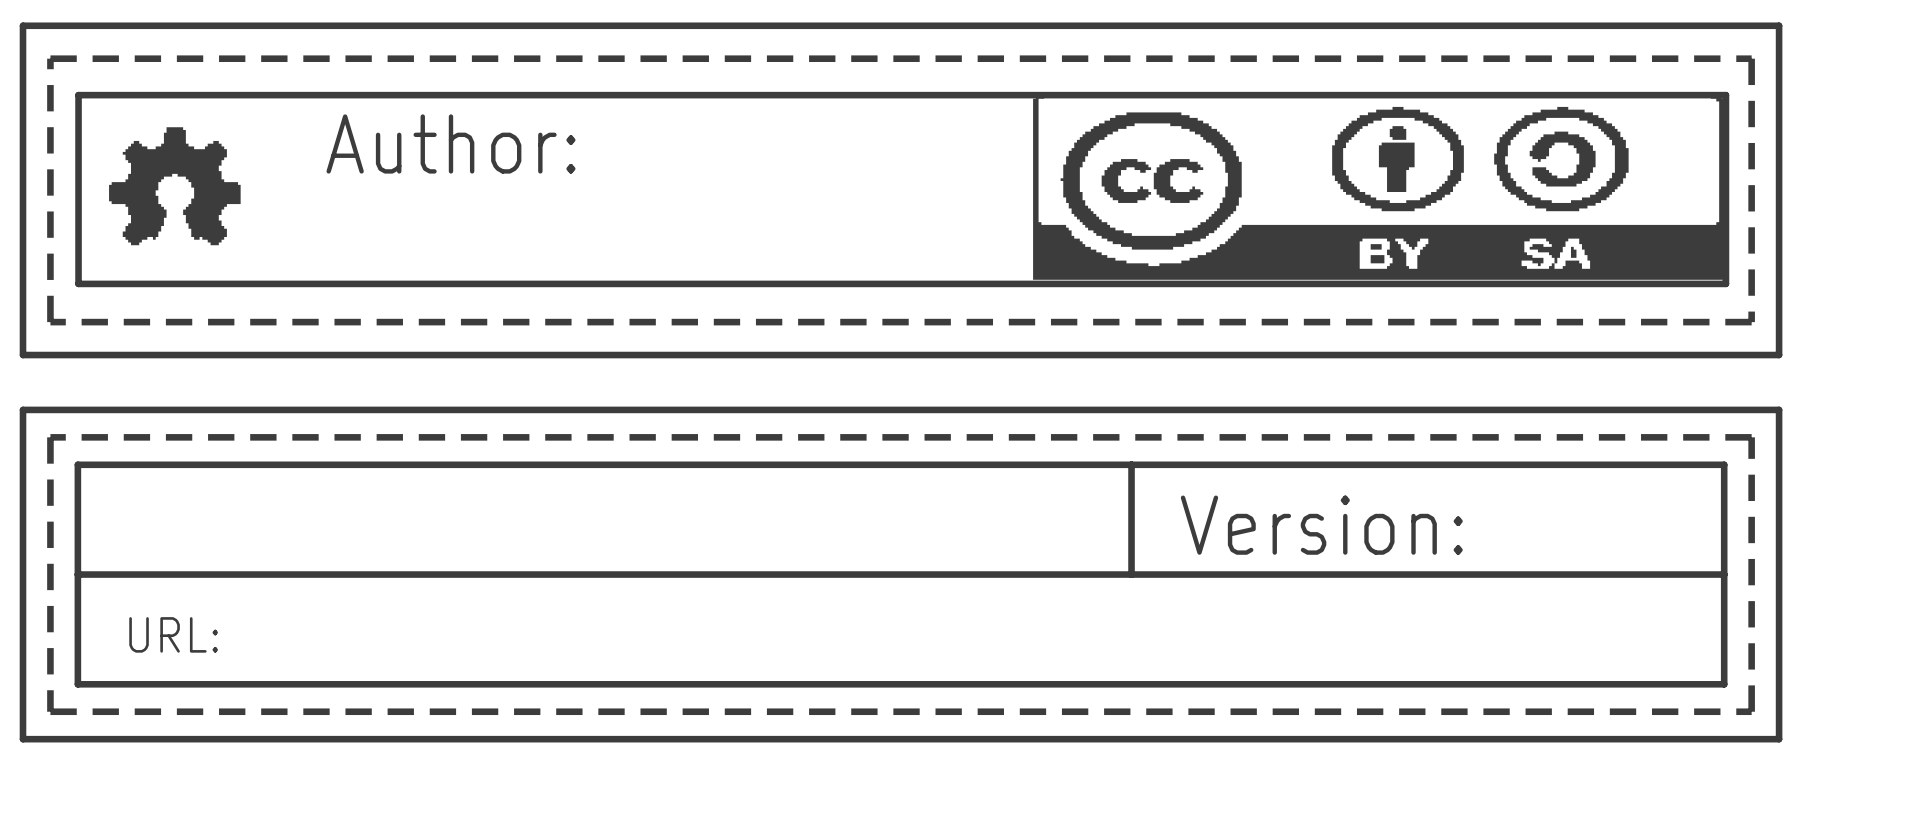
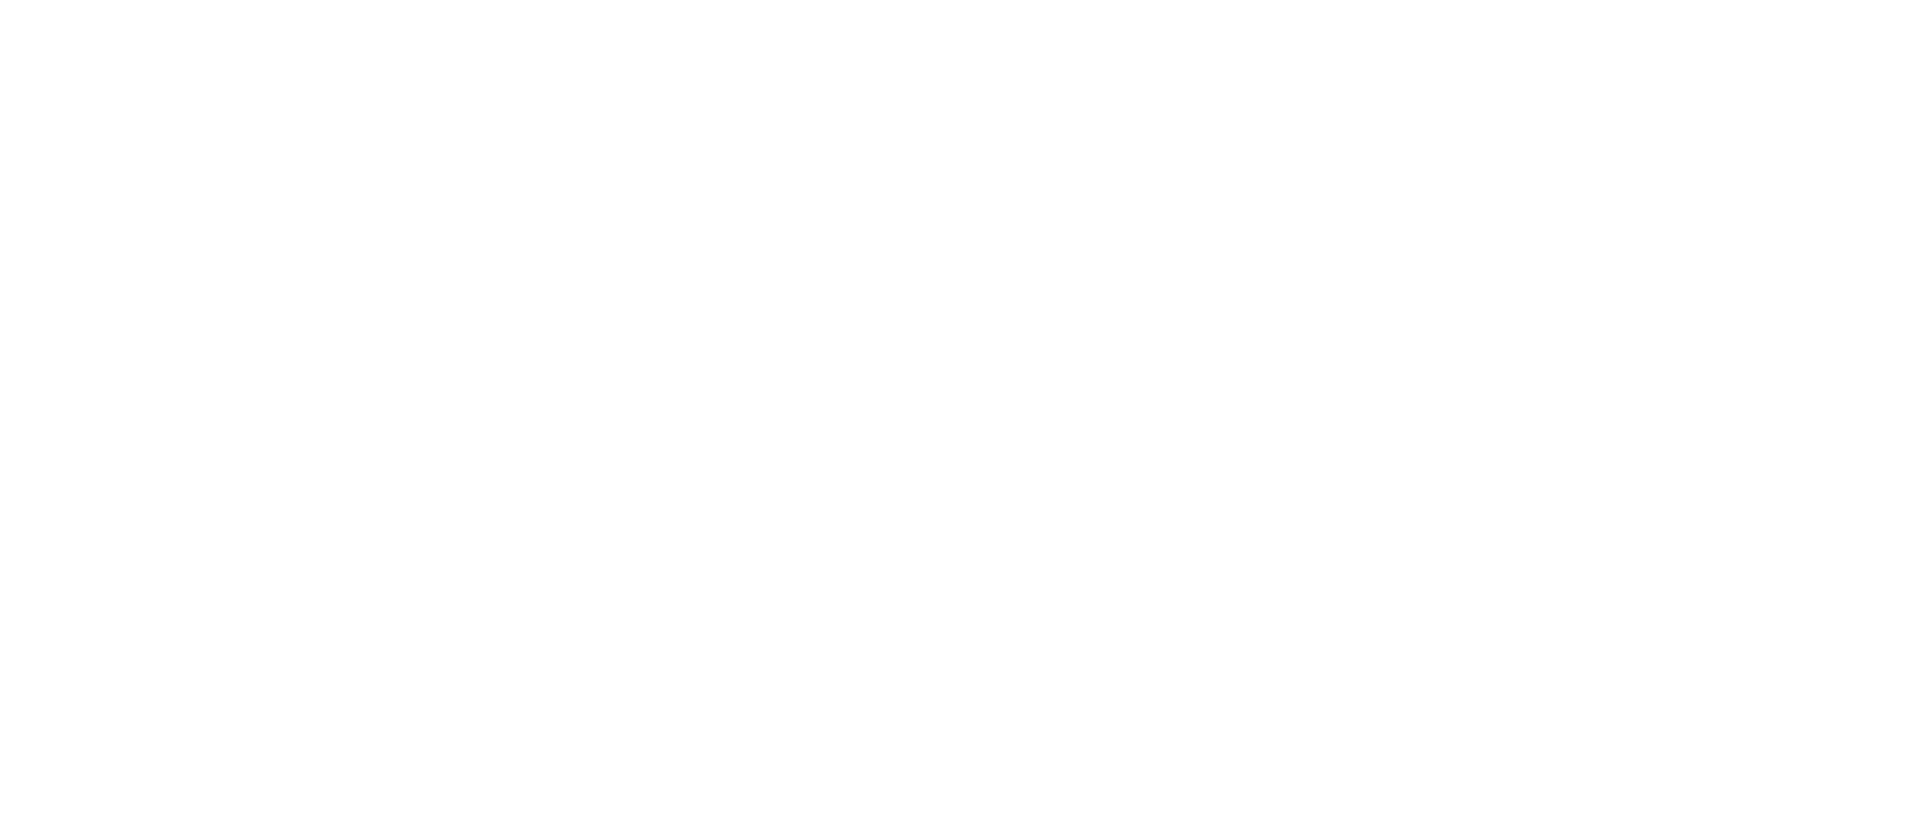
drawing: [19, 22, 1783, 743] -> none

